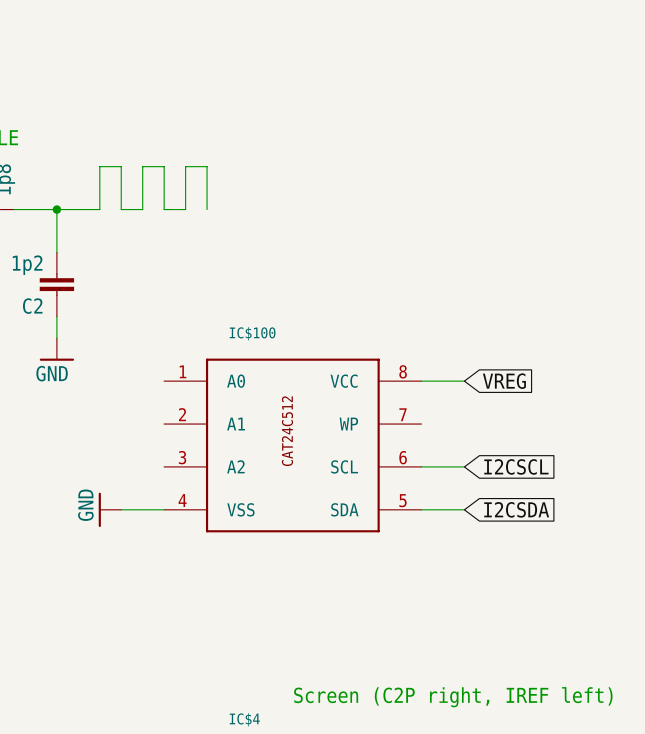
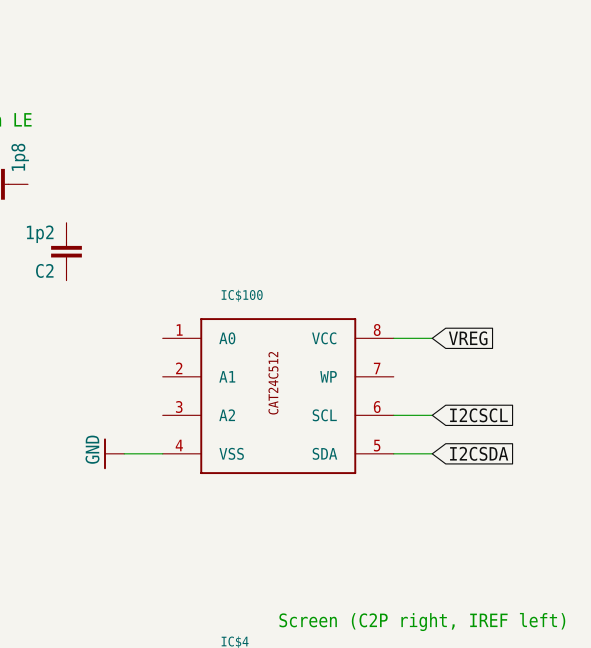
wire: (14, 209) (99, 209) (99, 166) (121, 166) (121, 209) (142, 209) (142, 166) (164, 166) (164, 209) (185, 209) (185, 166) (207, 166) (207, 209) -> none
wire: (56, 209) (56, 252) -> none
junction: (56, 209) -> none
wire: (56, 316) (56, 338) -> none
power symbol: GND (56, 349) -> none

